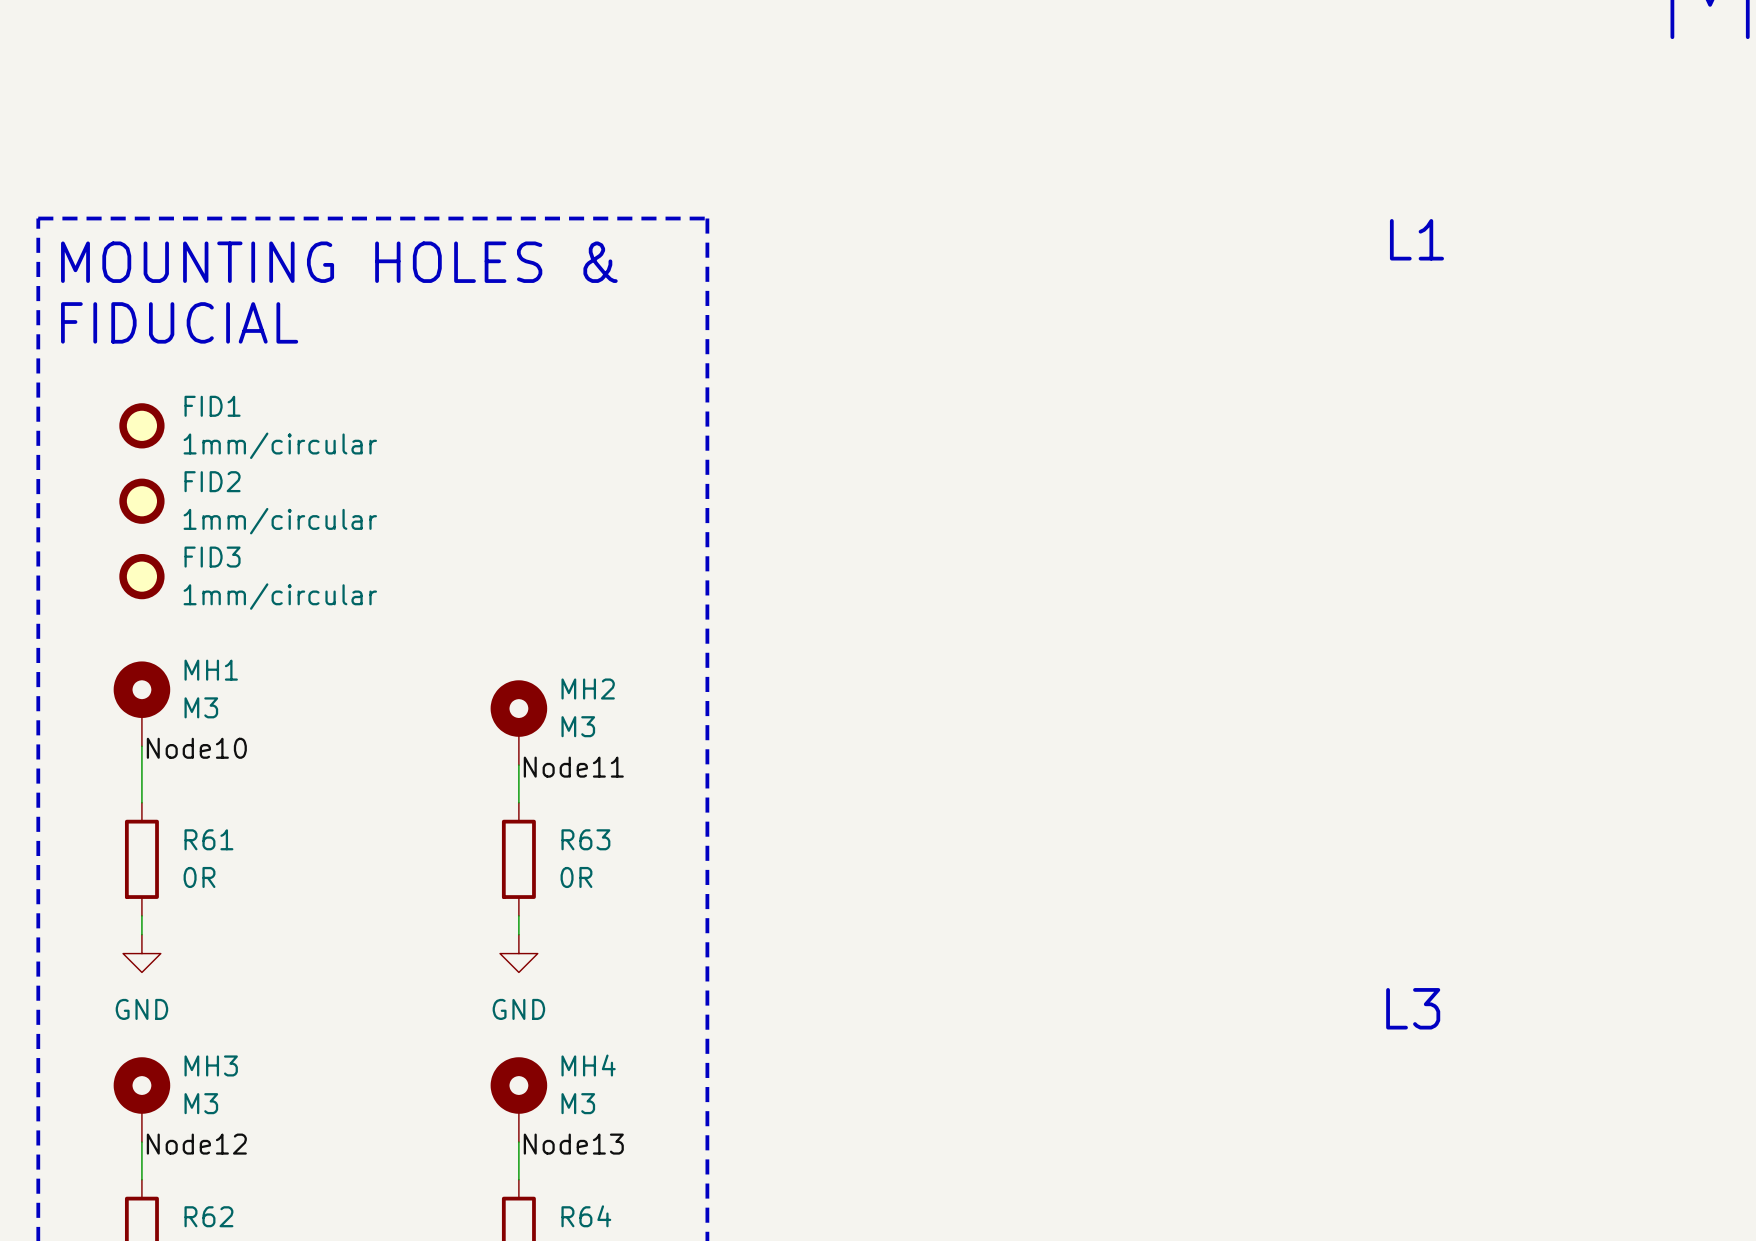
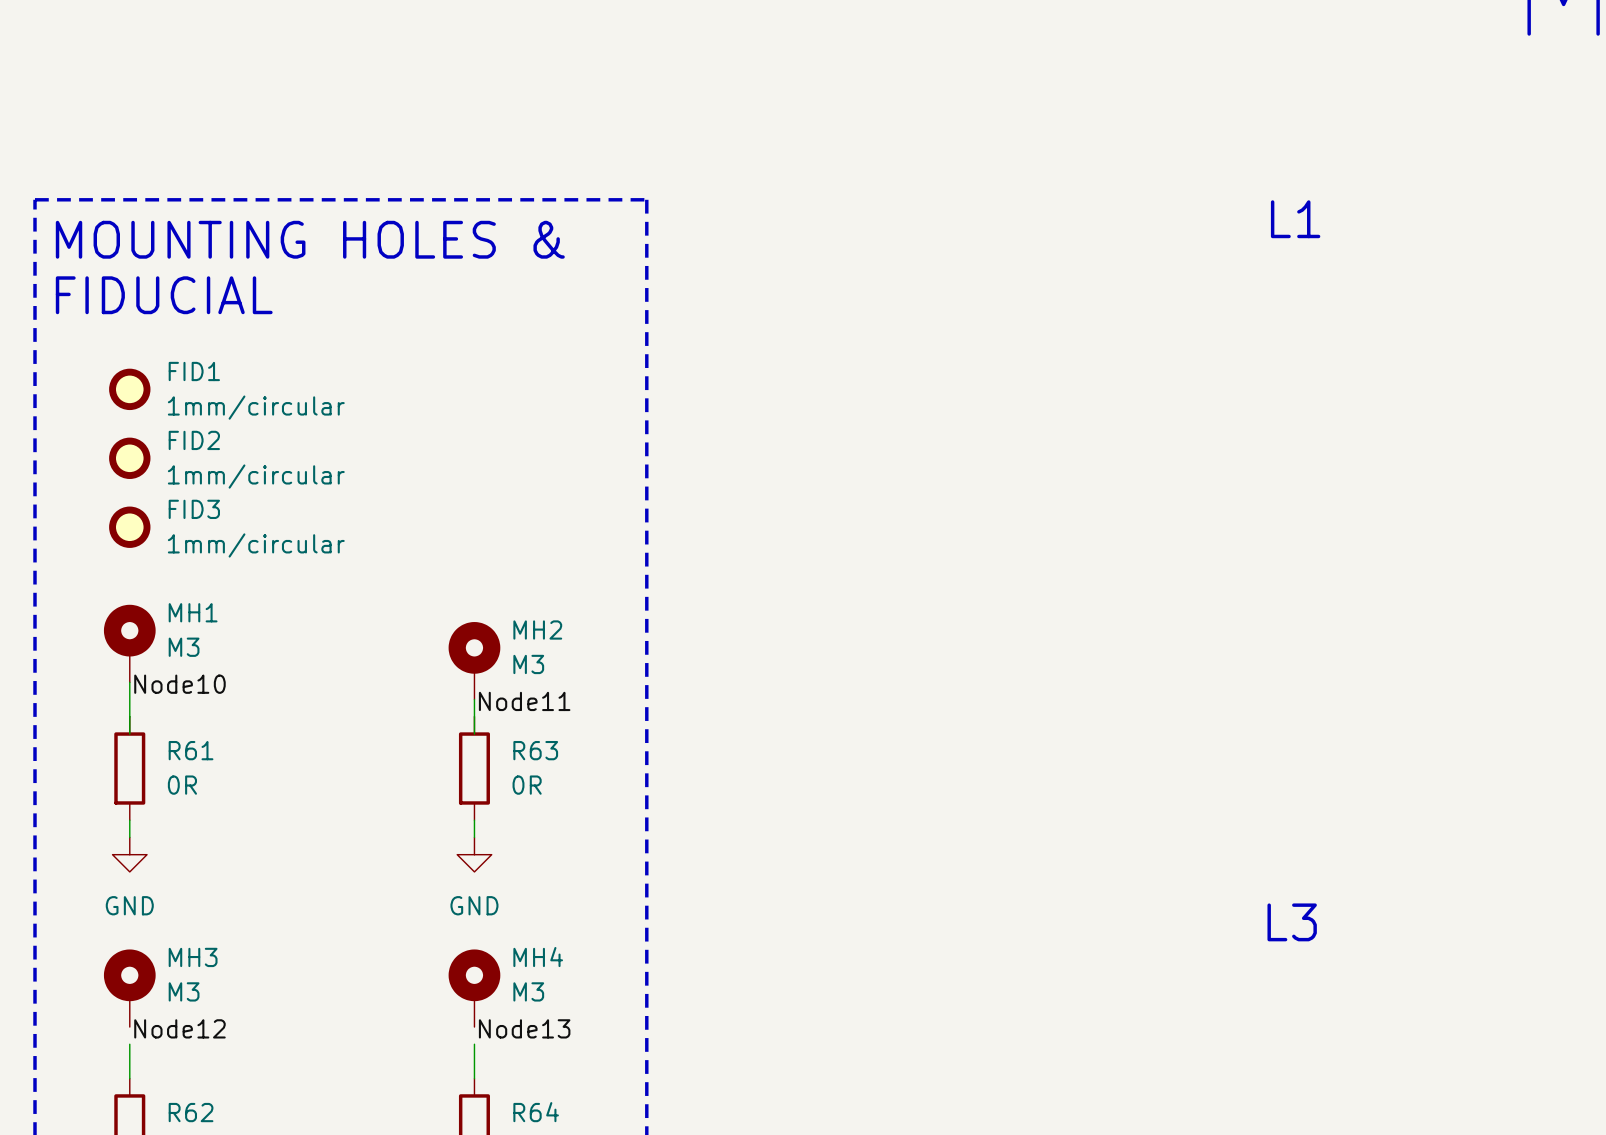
R61 position: (141, 859) -> (129, 768)
R63 position: (518, 859) -> (474, 768)
power symbol position: GND (141, 953) -> GND (129, 854)
power symbol position: GND (518, 953) -> GND (474, 854)
MH3 position: (141, 1099) -> (129, 988)
MH4 position: (518, 1099) -> (474, 988)
label position: Node12 (196, 1144) -> Node12 (179, 1028)
label position: Node13 (573, 1144) -> Node13 (524, 1028)

